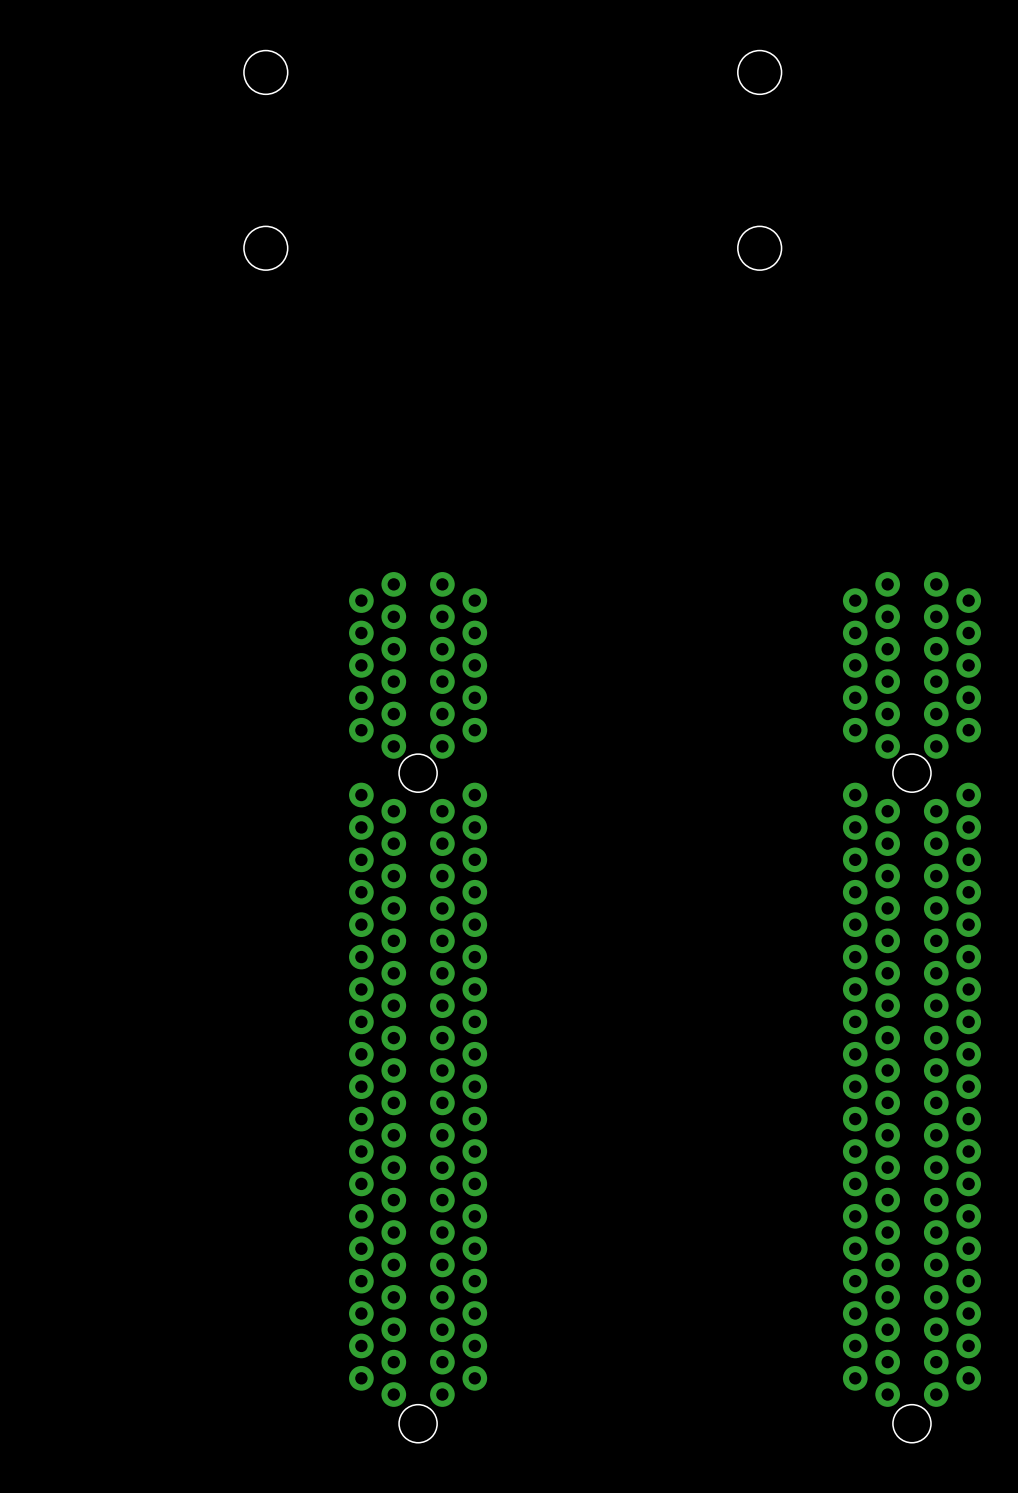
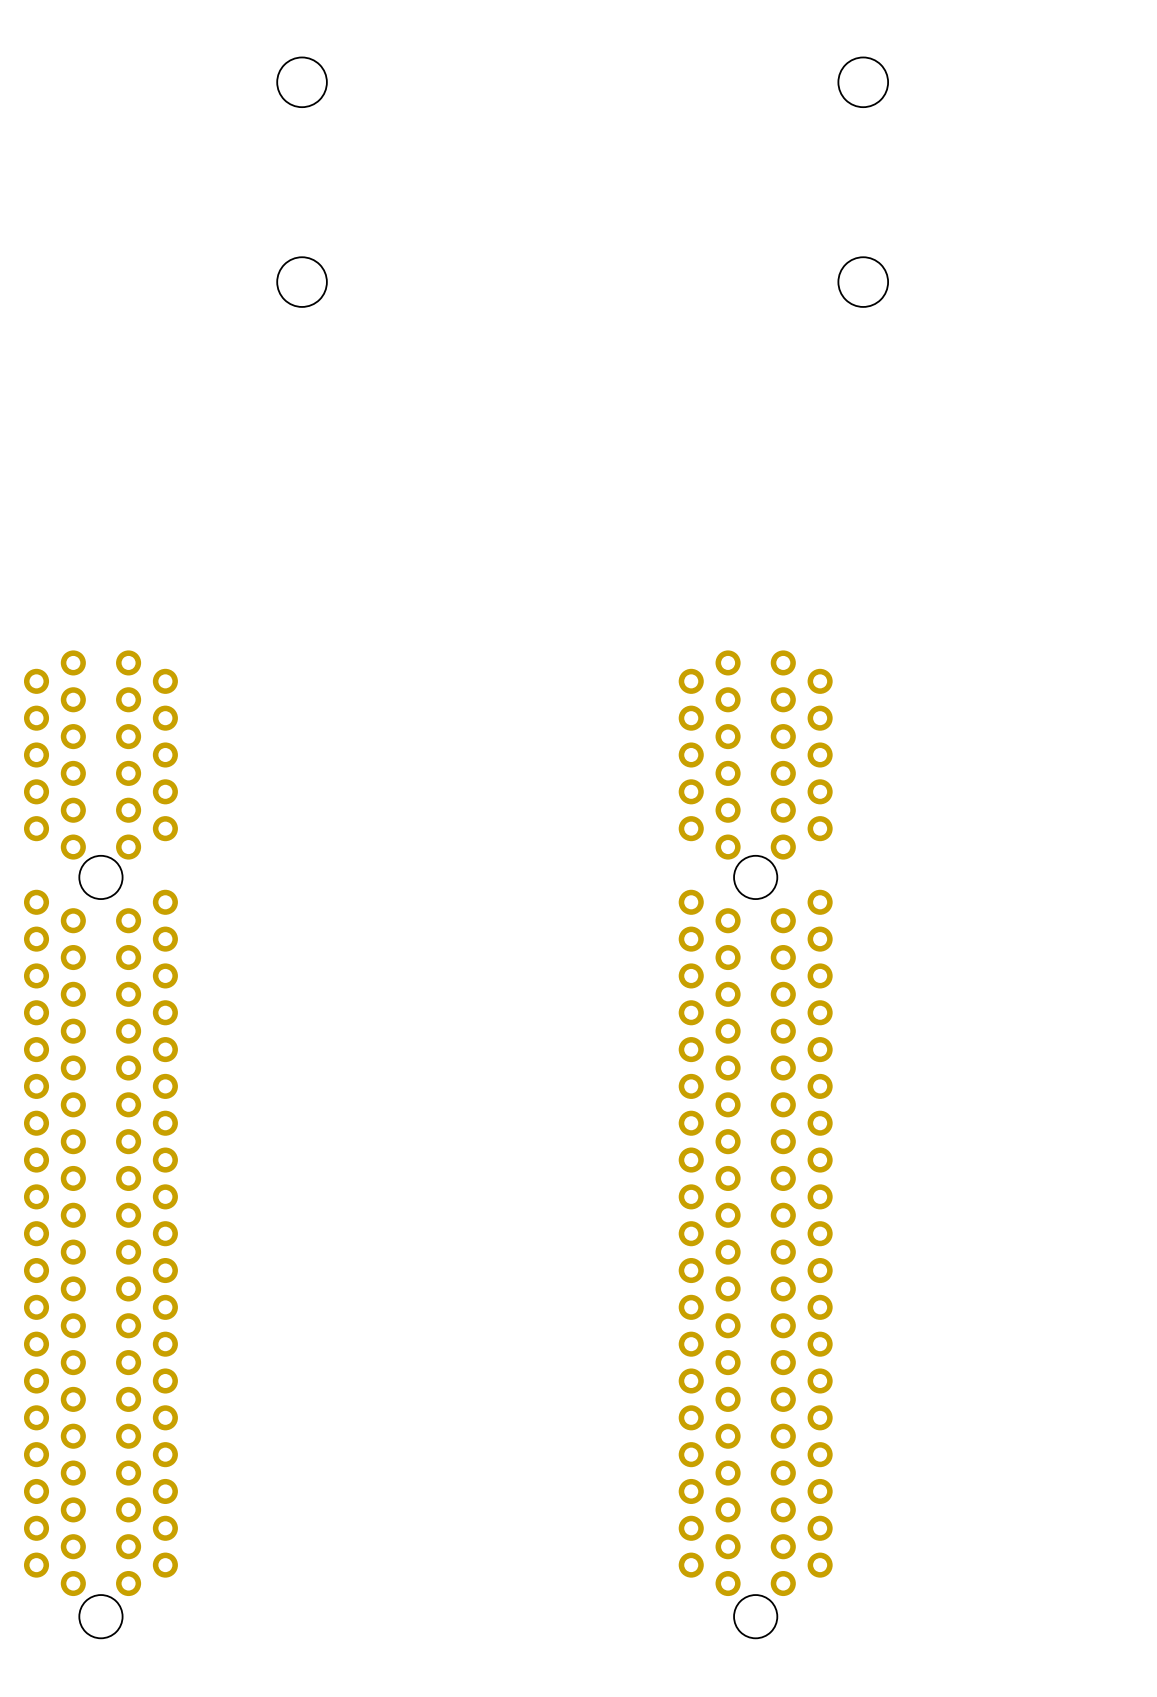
part: none -> (100, 1144)
part: (418, 1007) -> none
part: none -> (755, 1144)
part: (911, 1007) -> none

